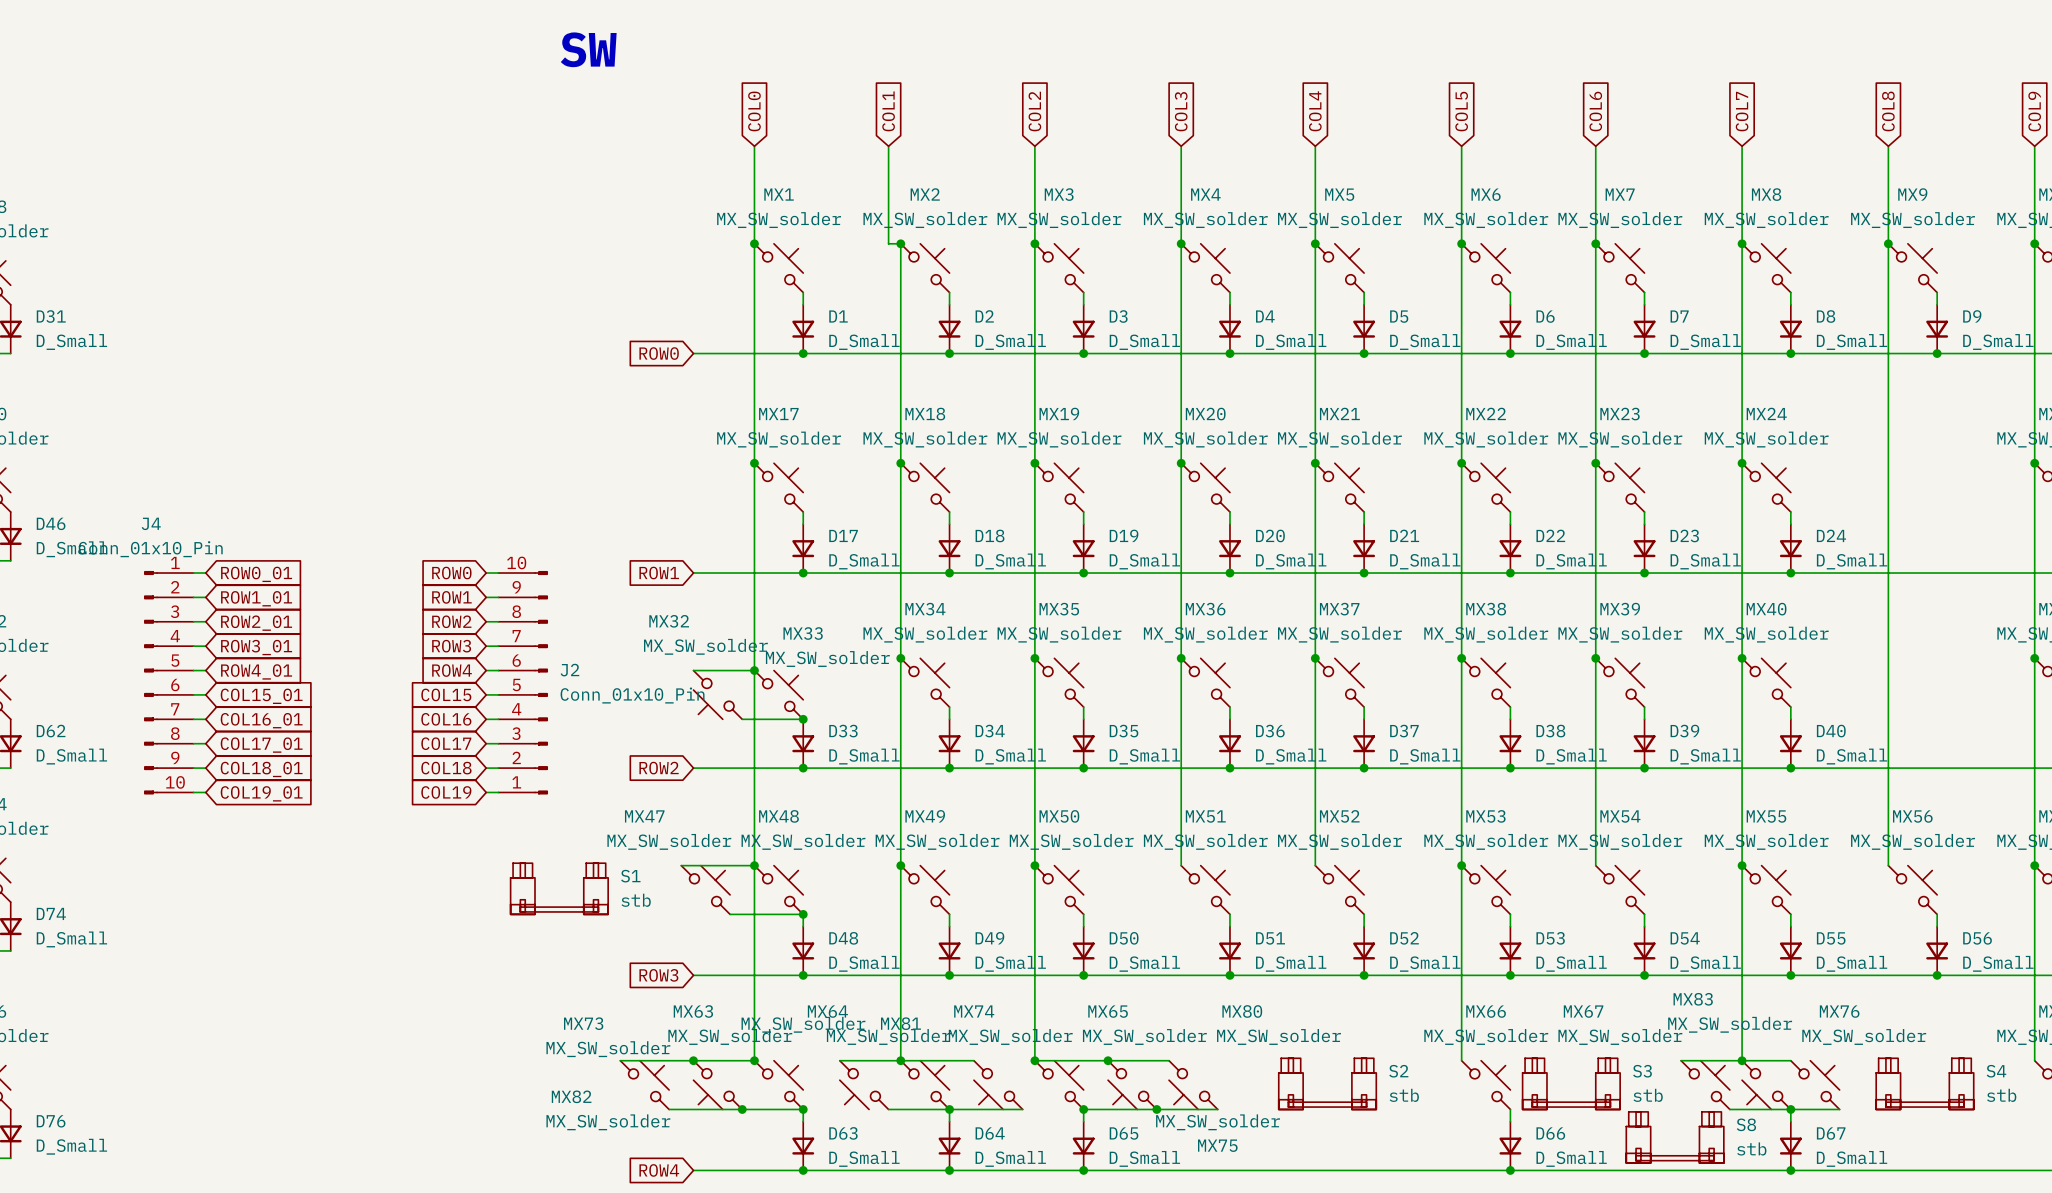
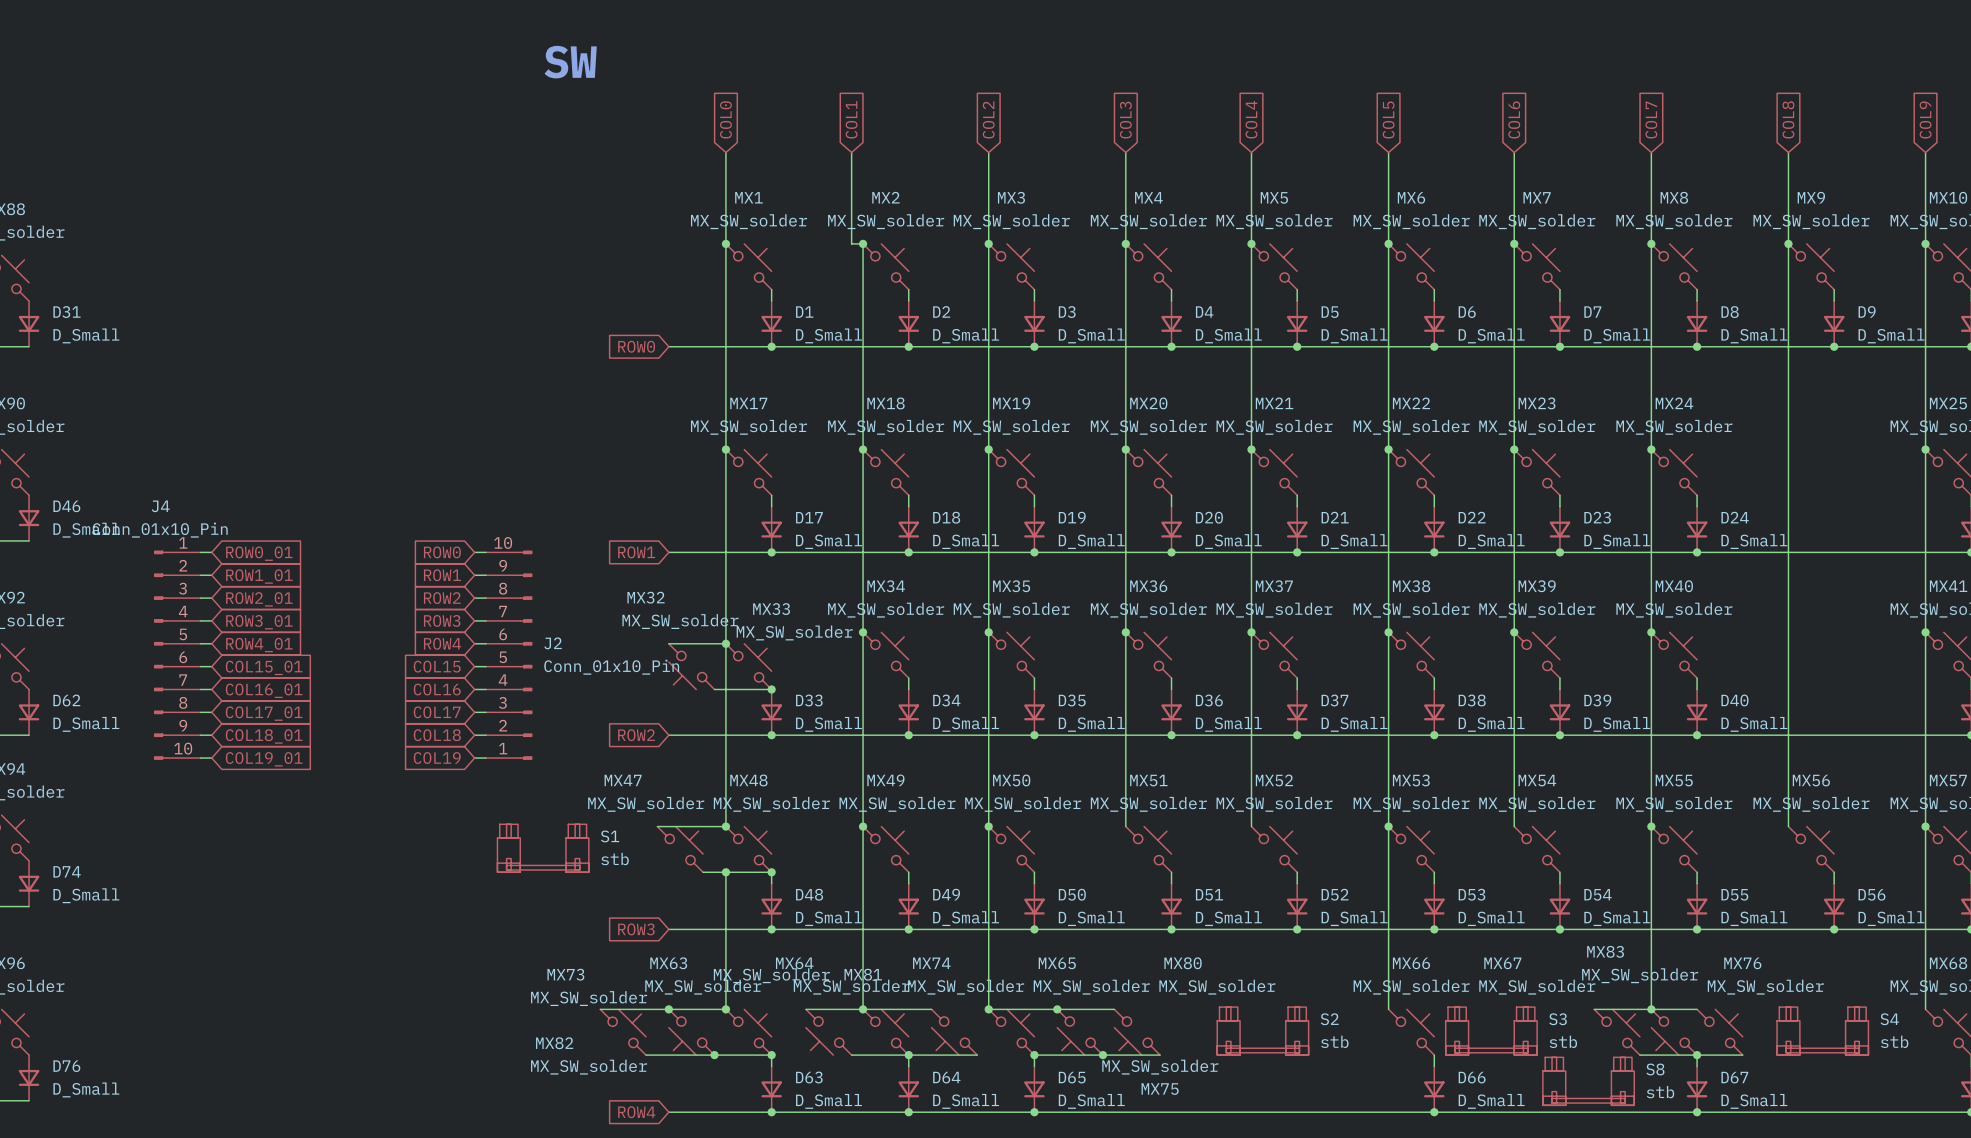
wire: (754, 865) (754, 914) -> none
junction: none -> (725, 872)

